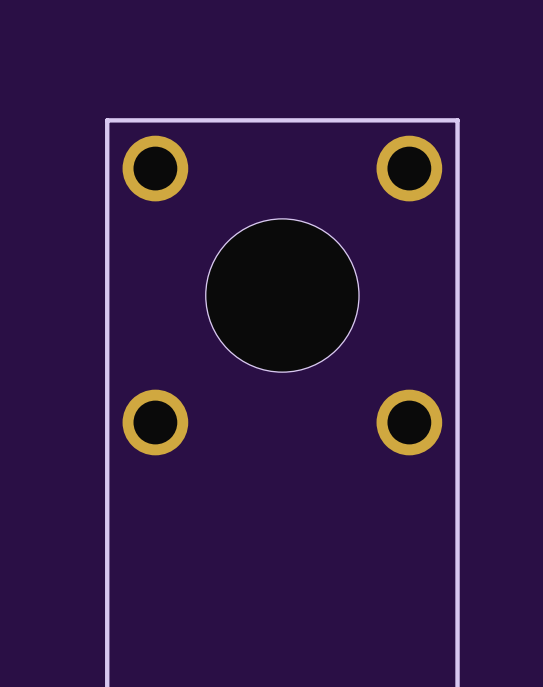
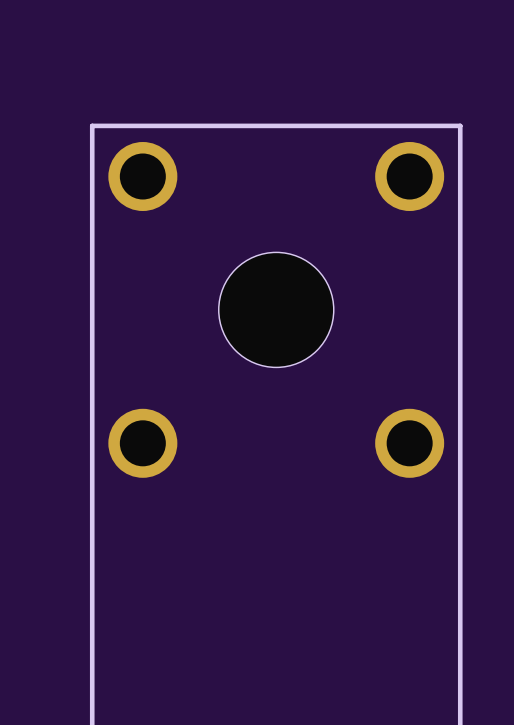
hole size: [205, 218, 360, 373] -> [218, 252, 334, 368]

